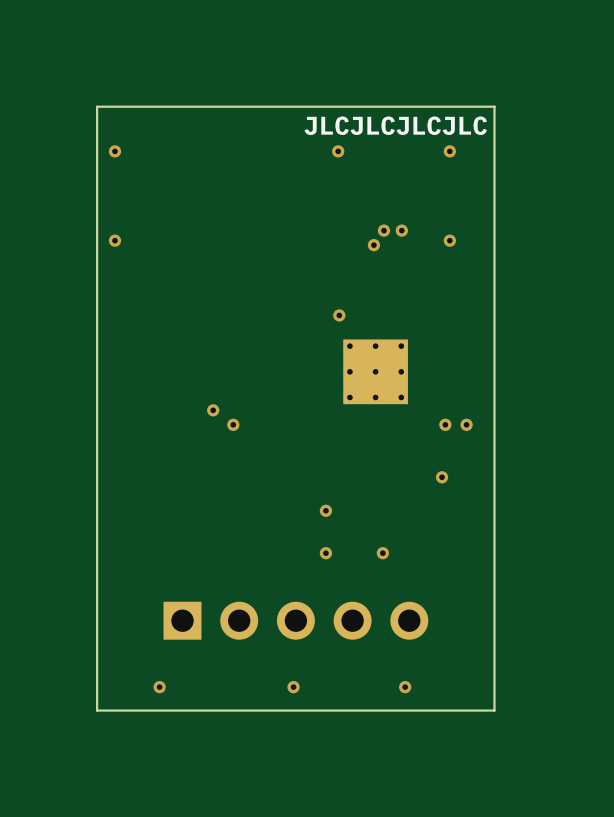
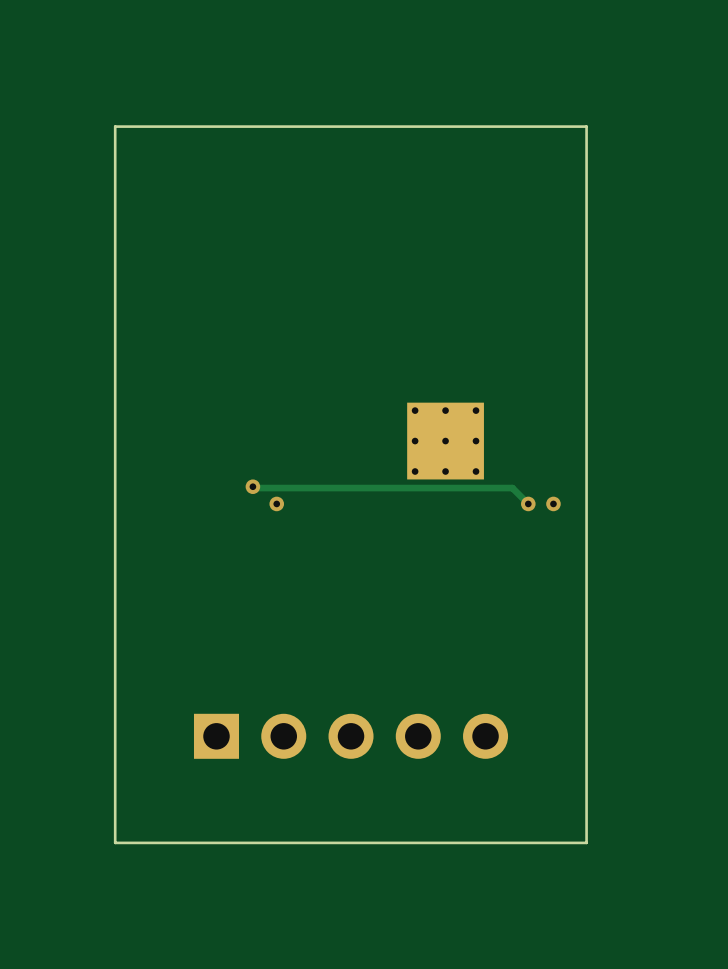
text: JLCJLCJLCJLC (395, 125) -> none
via: (114, 151) -> none
via: (338, 151) -> none
via: (449, 151) -> none
via: (383, 230) -> none
via: (401, 230) -> none
via: (114, 240) -> none
via: (449, 240) -> none
via: (373, 245) -> none
via: (339, 315) -> none
track: none -> (254, 489) (512, 488) (528, 503)
via: (442, 477) -> none
via: (325, 510) -> none
via: (325, 553) -> none
via: (382, 553) -> none
via: (159, 687) -> none
via: (293, 687) -> none
via: (405, 687) -> none

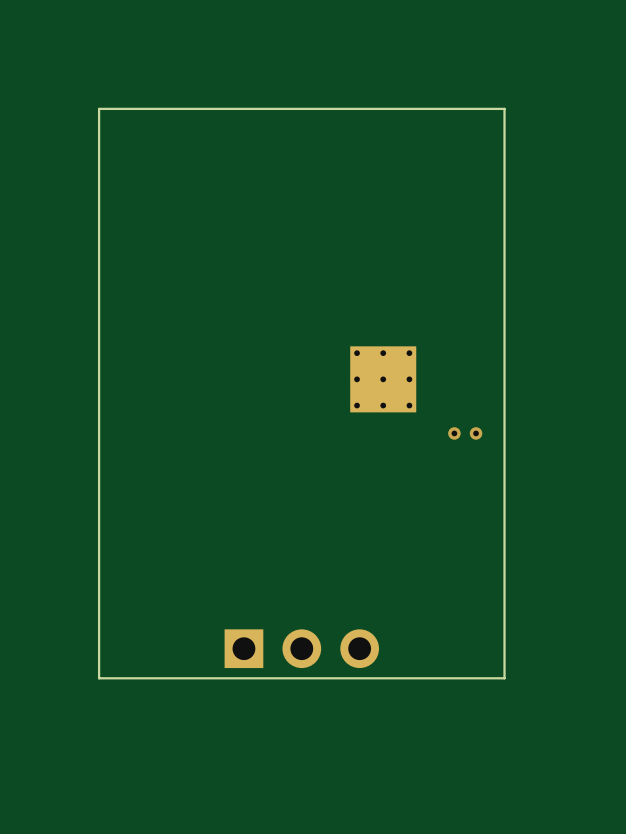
via: (252, 486) -> none
track: (254, 489) (512, 488) (528, 503) -> none
via: (276, 503) -> none
part footprint: [193, 713, 509, 759] -> [224, 629, 380, 669]
board edge: (586, 788) (586, 842) (115, 842) (115, 788) -> (504, 678) (99, 678)

